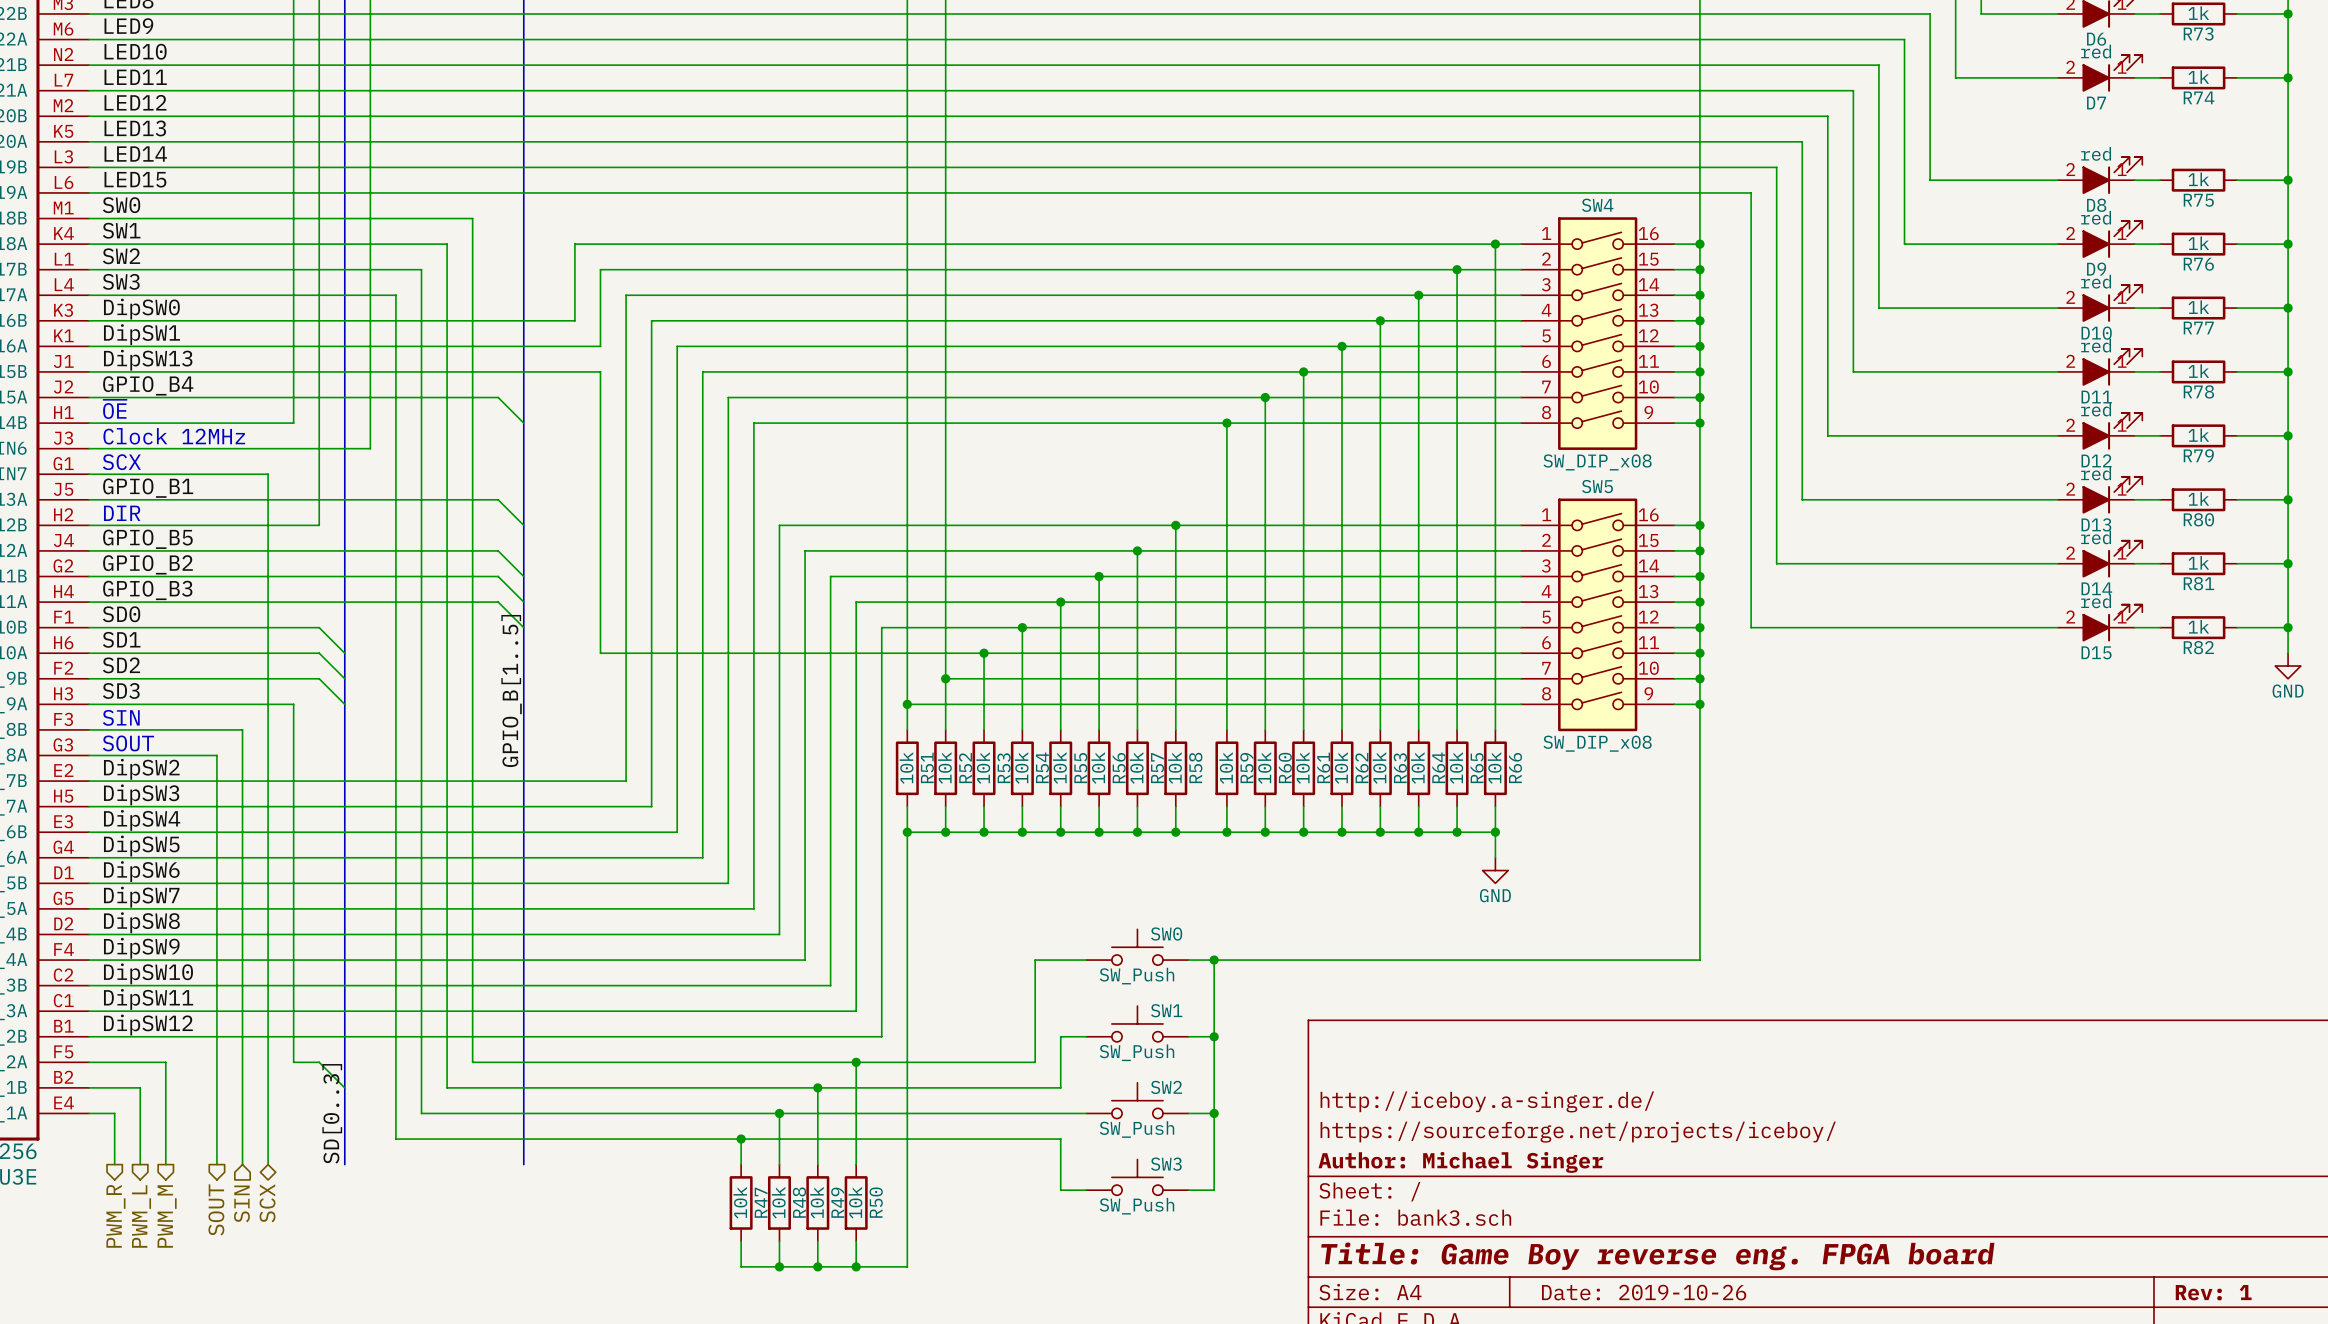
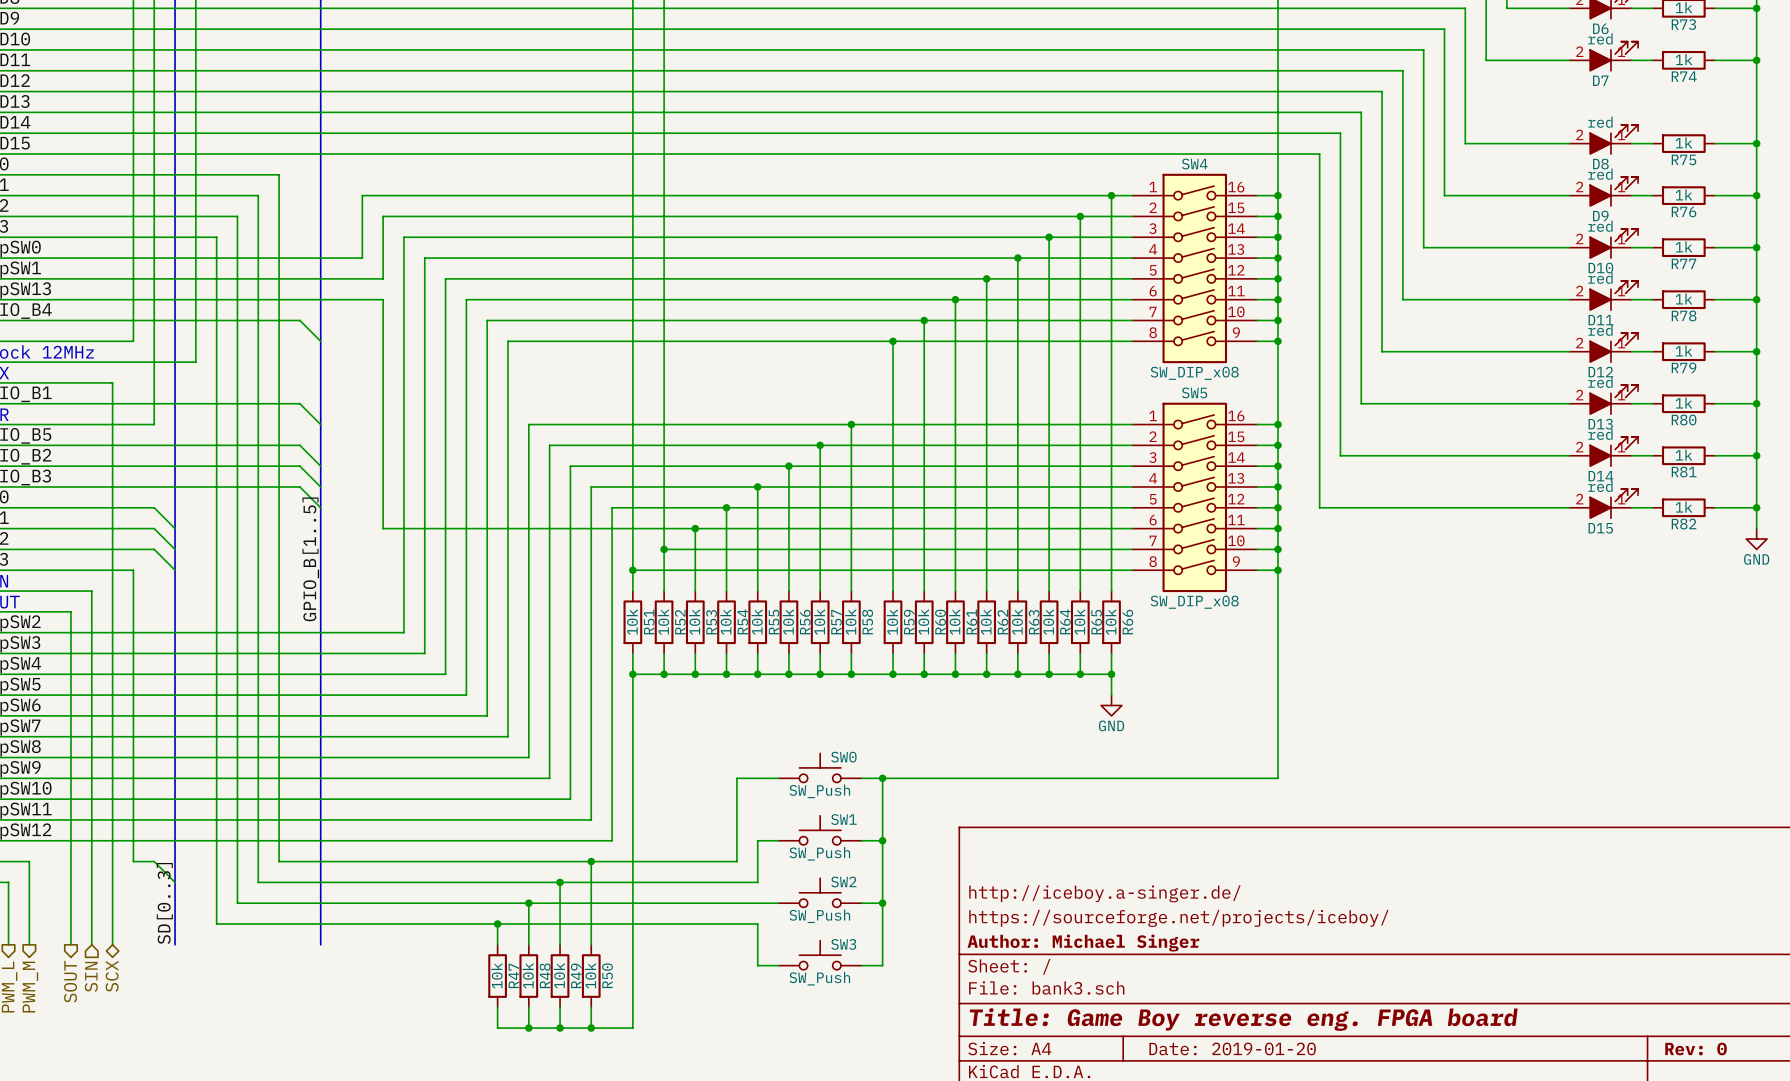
title block: Date: 2019-10-26 (1644, 1292) -> Date: 2019-01-20 (1232, 1048)
title block: Rev: 1 (2213, 1292) -> Rev: 0 (1696, 1048)

